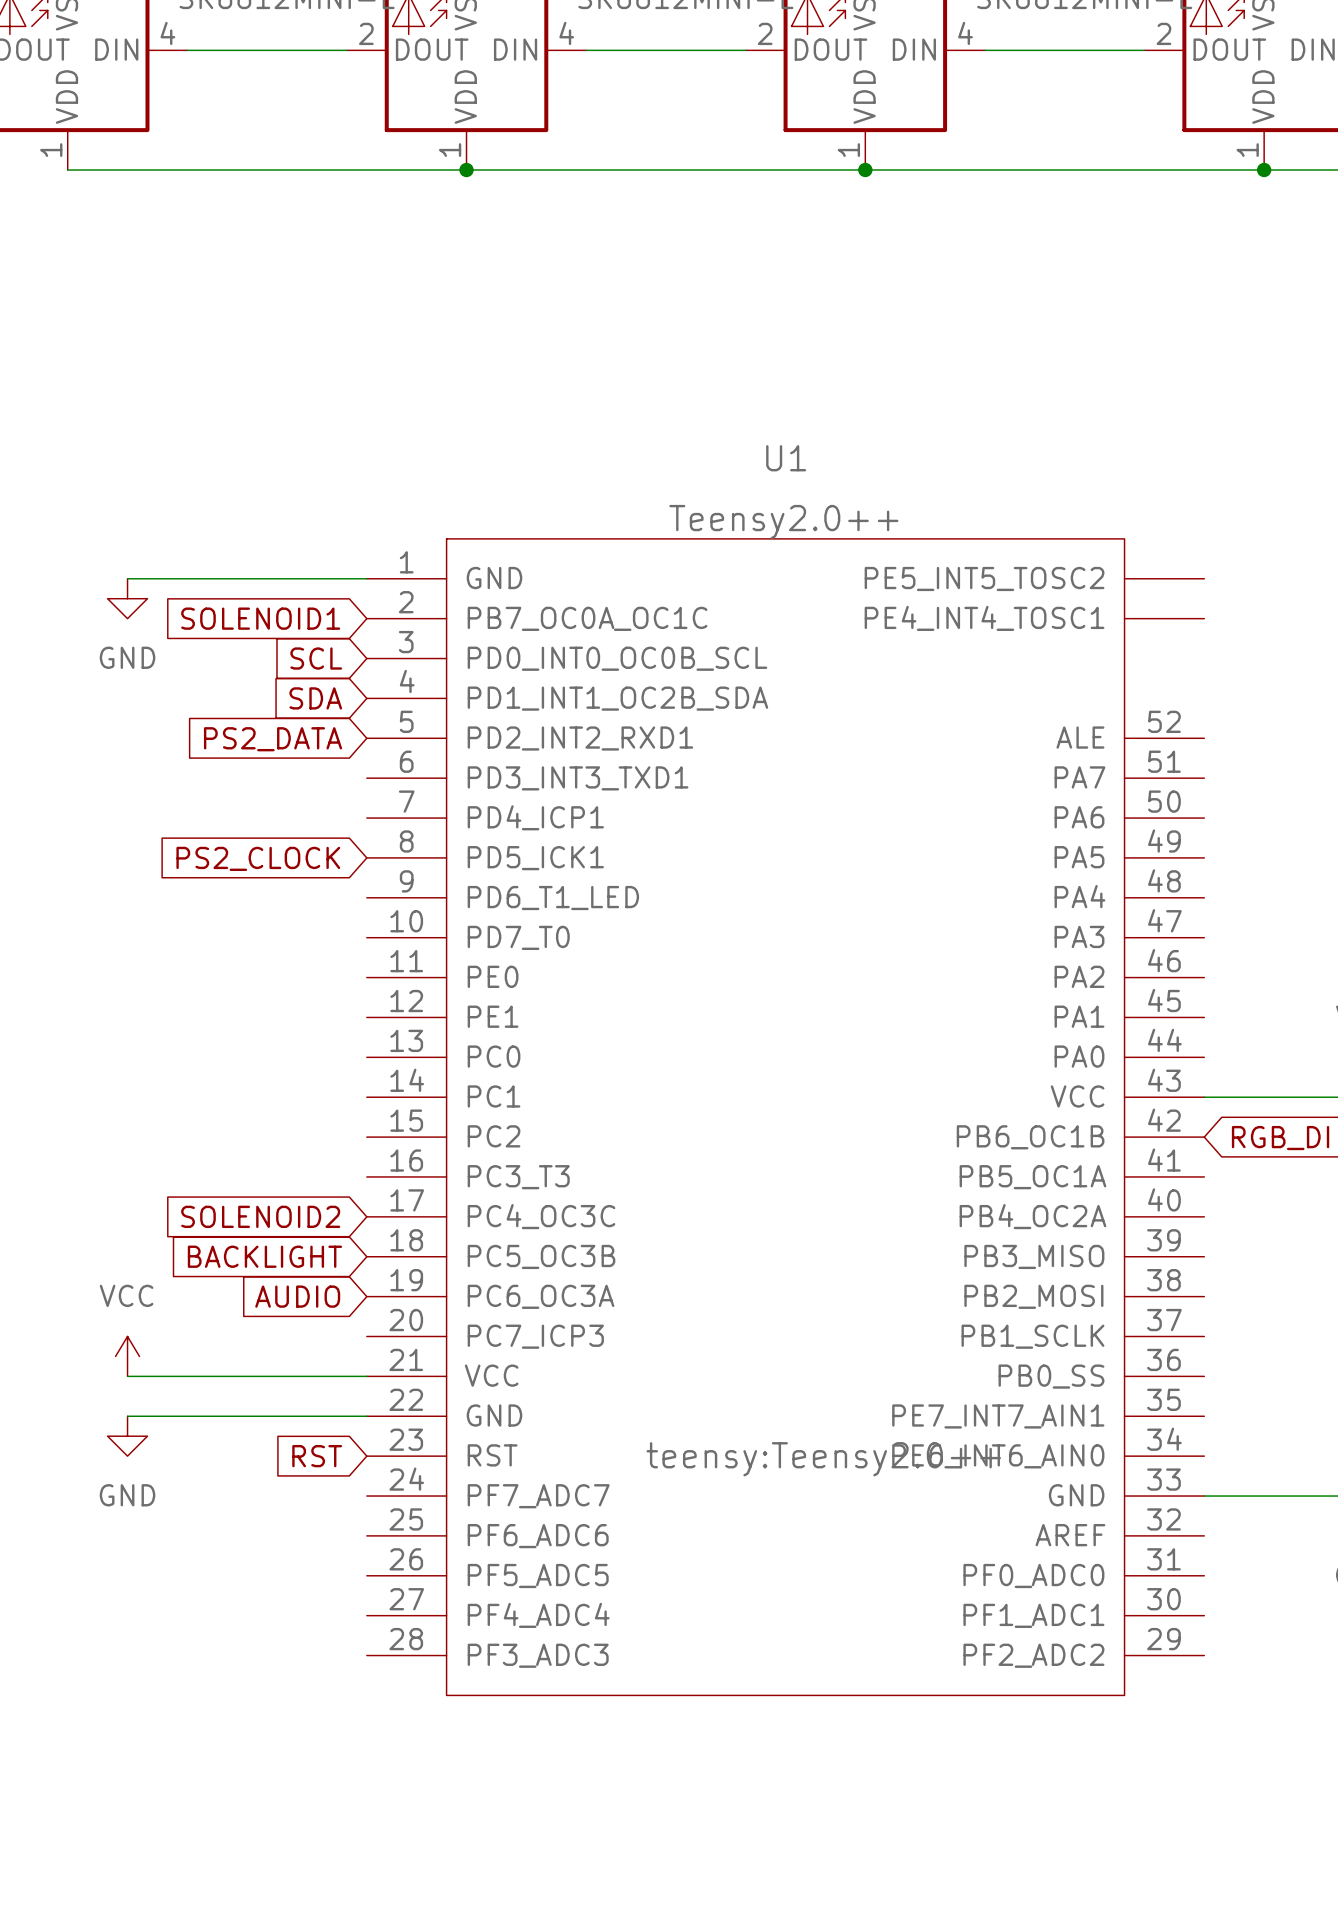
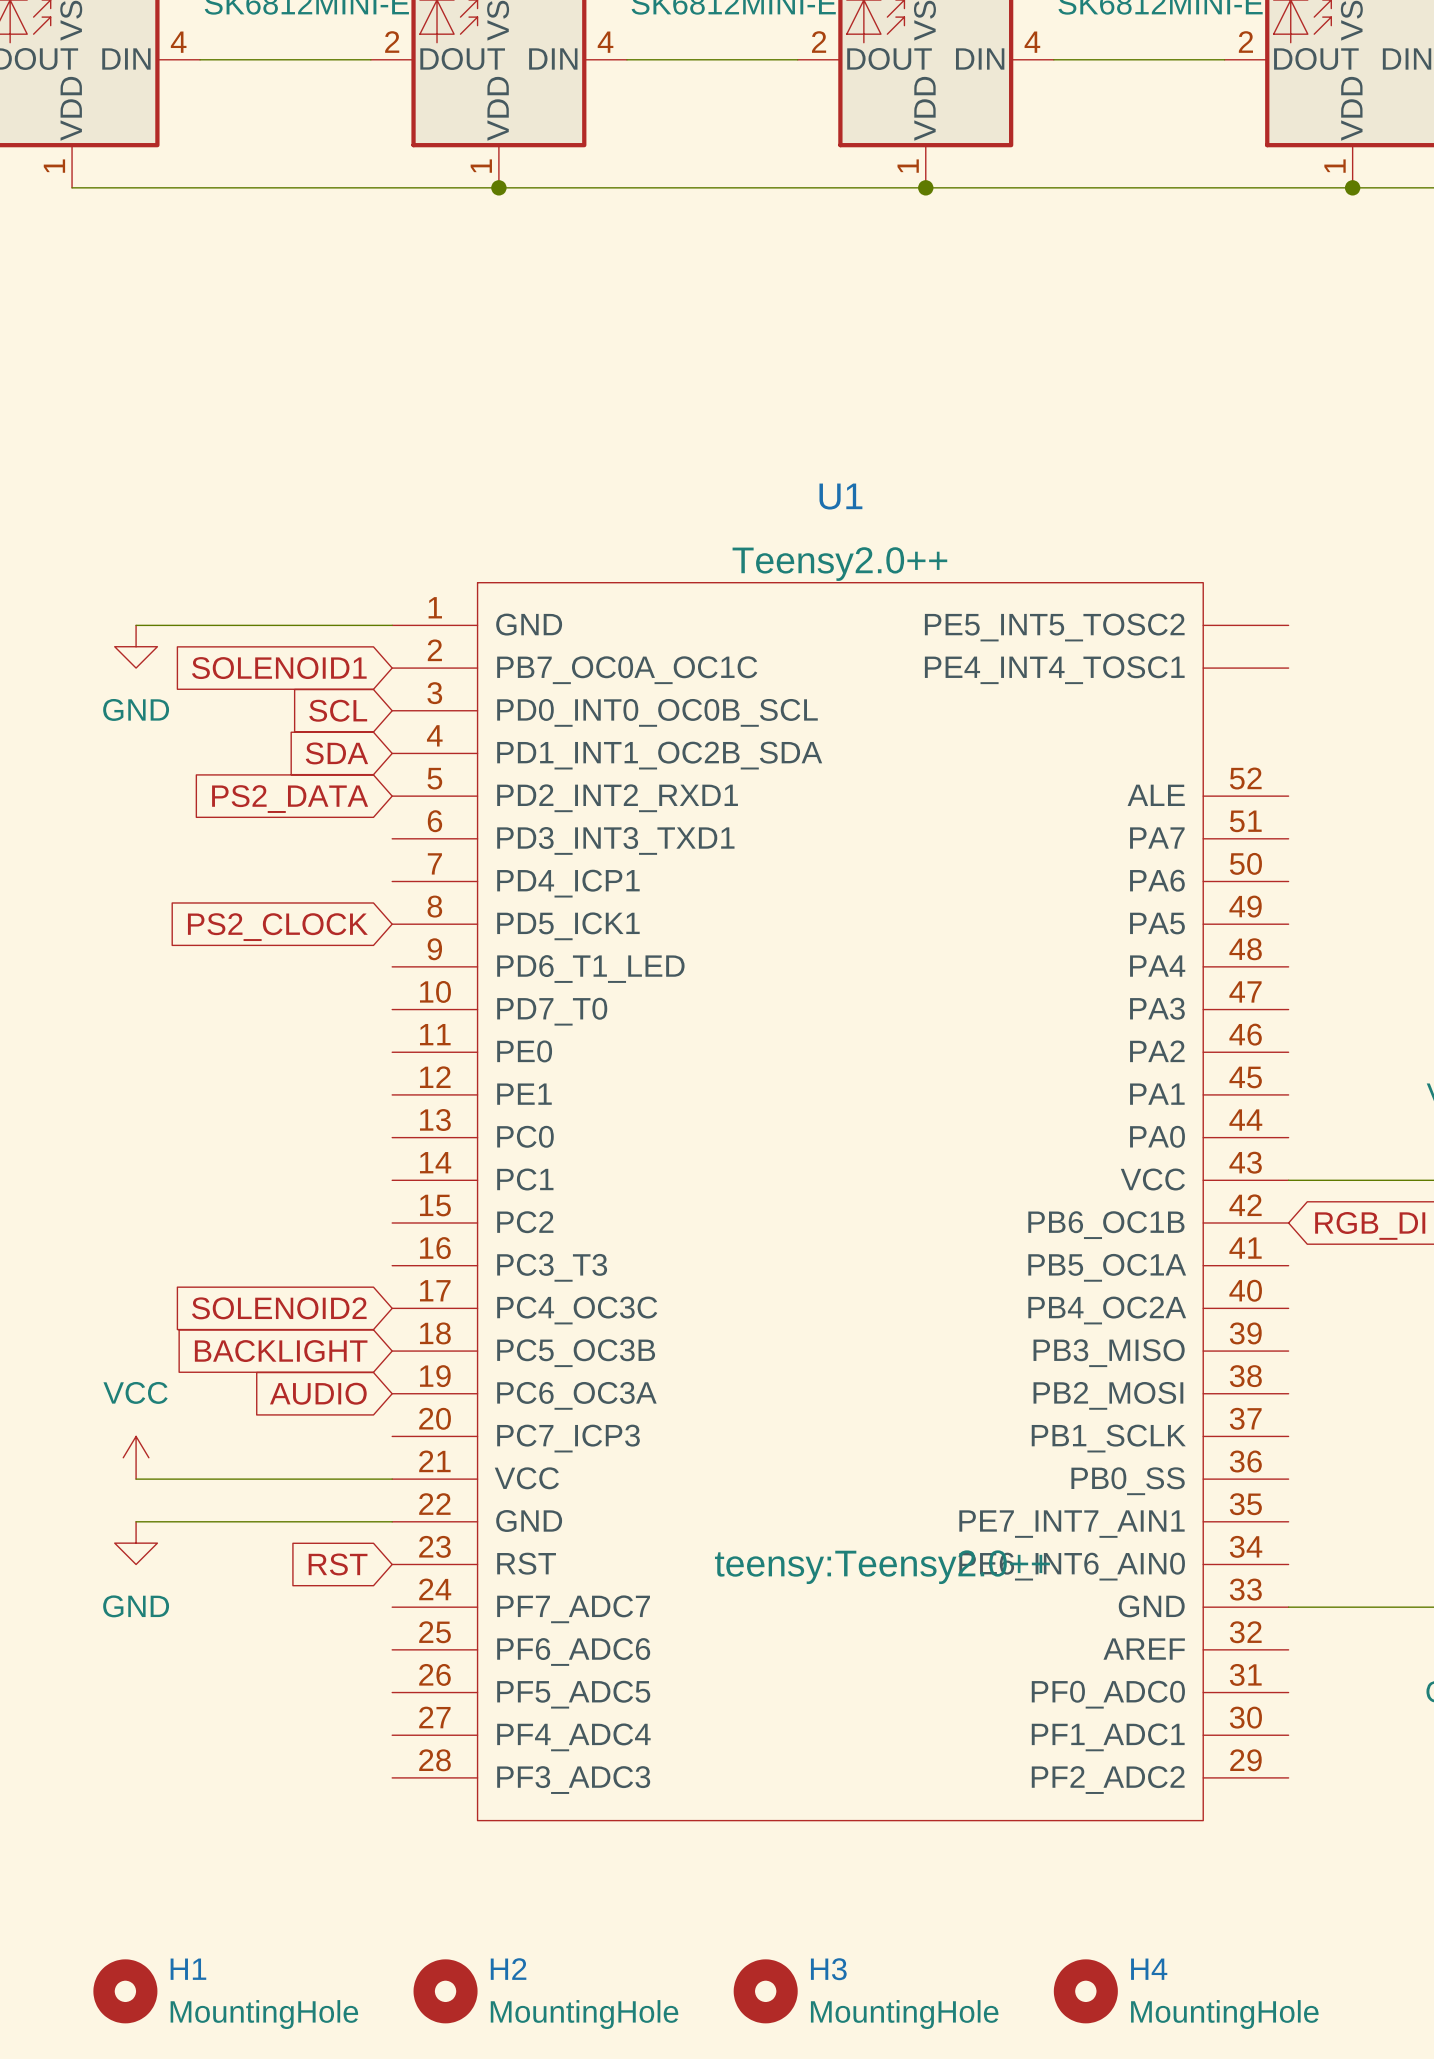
H1: none -> MountingHole (125, 1991)
H2: none -> MountingHole (445, 1991)
H3: none -> MountingHole (765, 1991)
H4: none -> MountingHole (1085, 1991)

